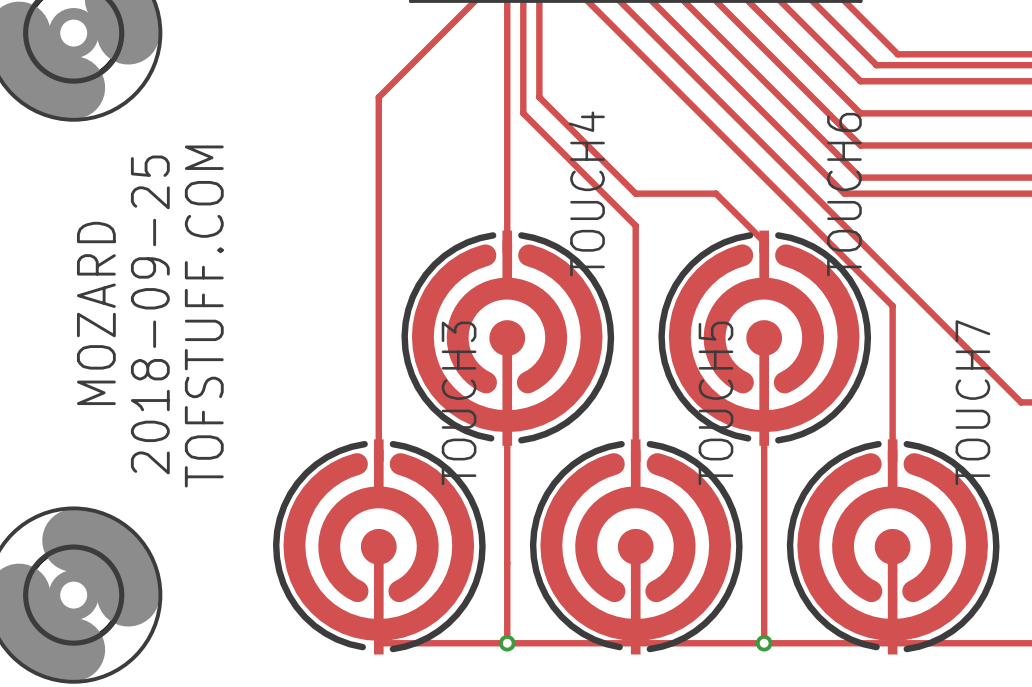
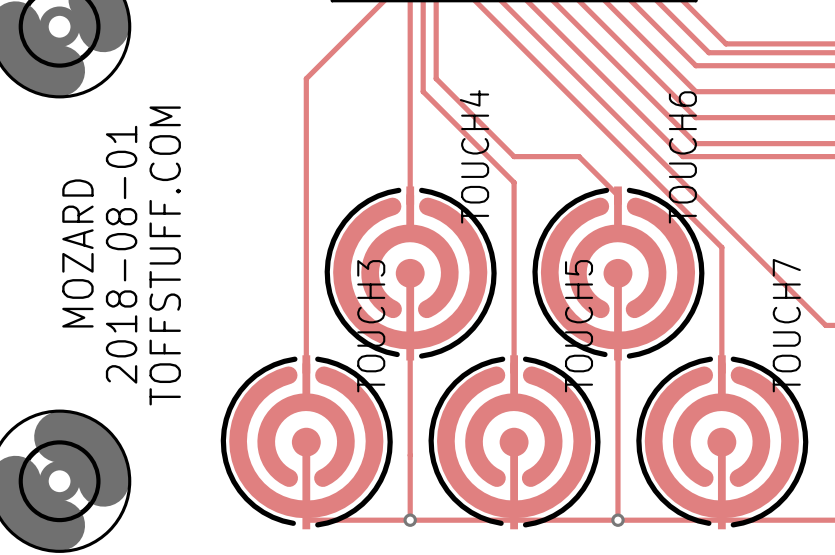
text: 2018-09-25 (150, 314) -> 2018-08-01 (121, 254)
text: TOFSTUFF.COM (204, 316) -> TOFFSTUFF.COM (165, 255)

